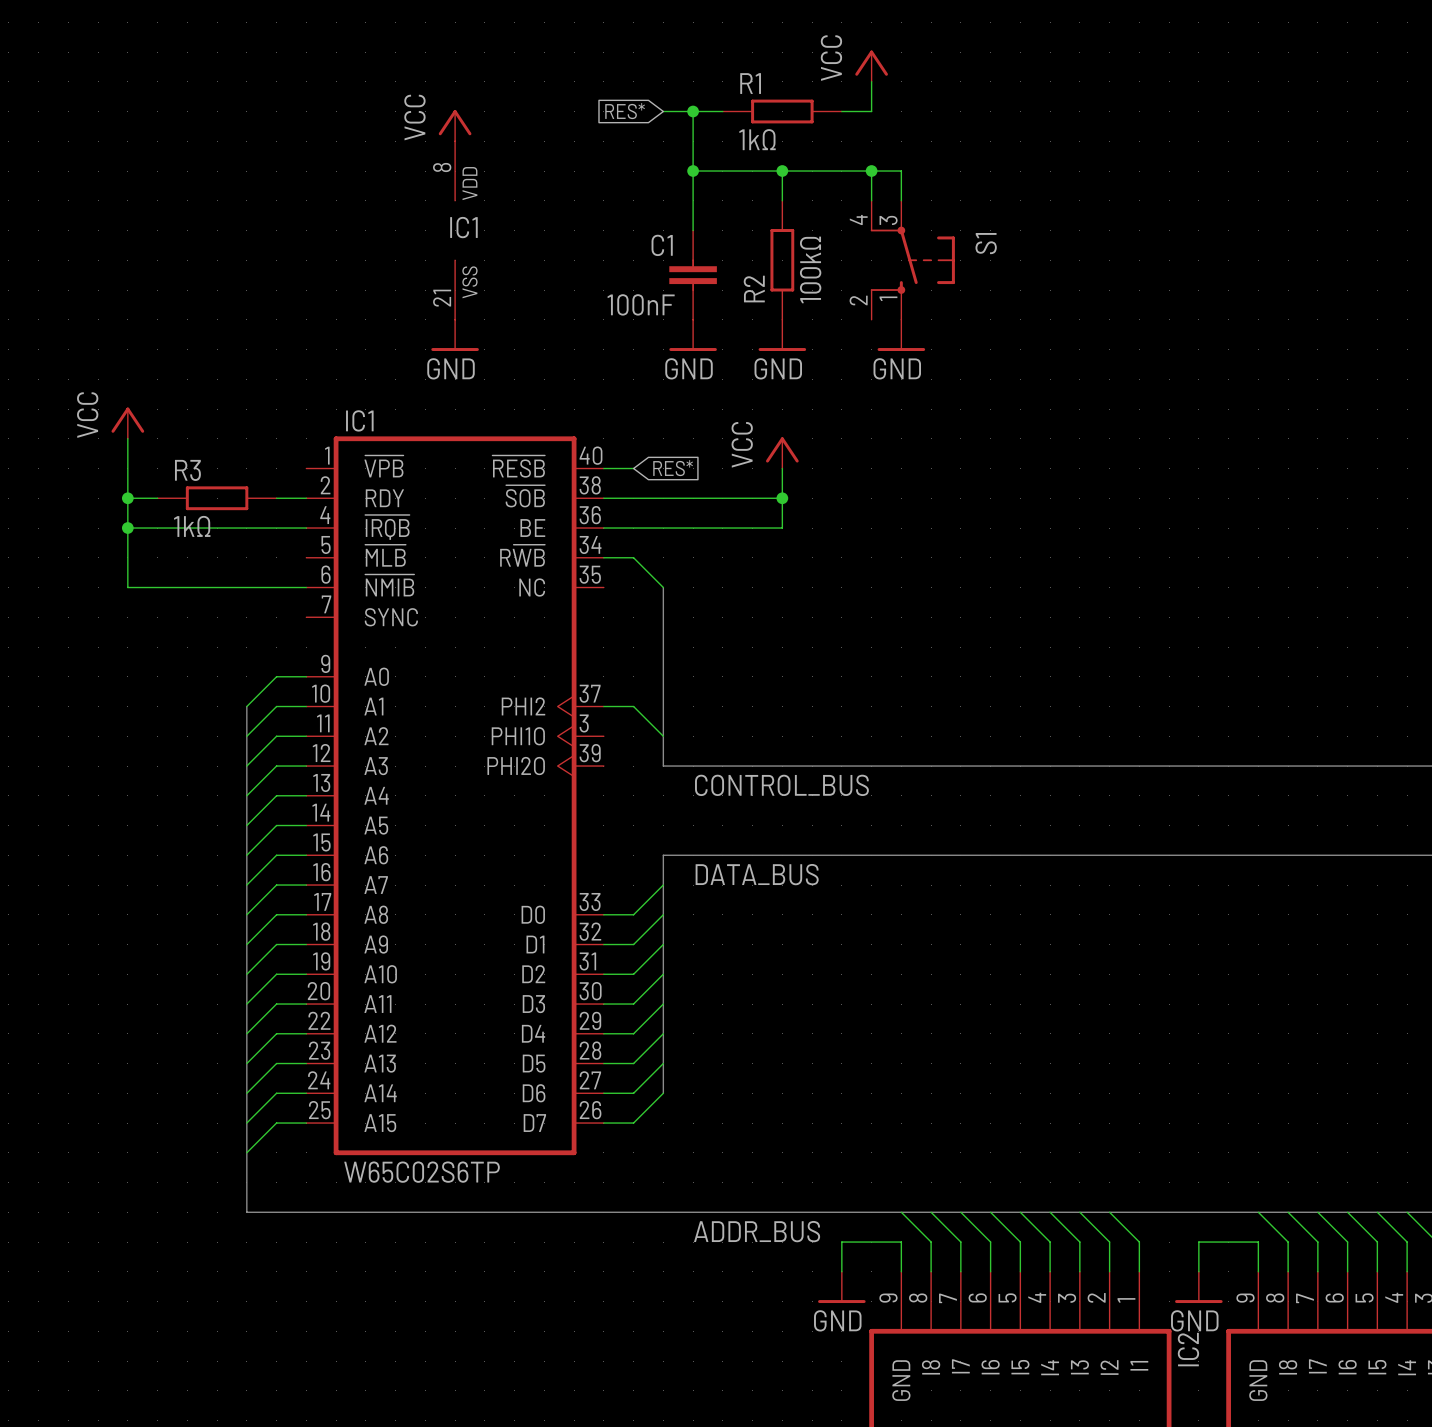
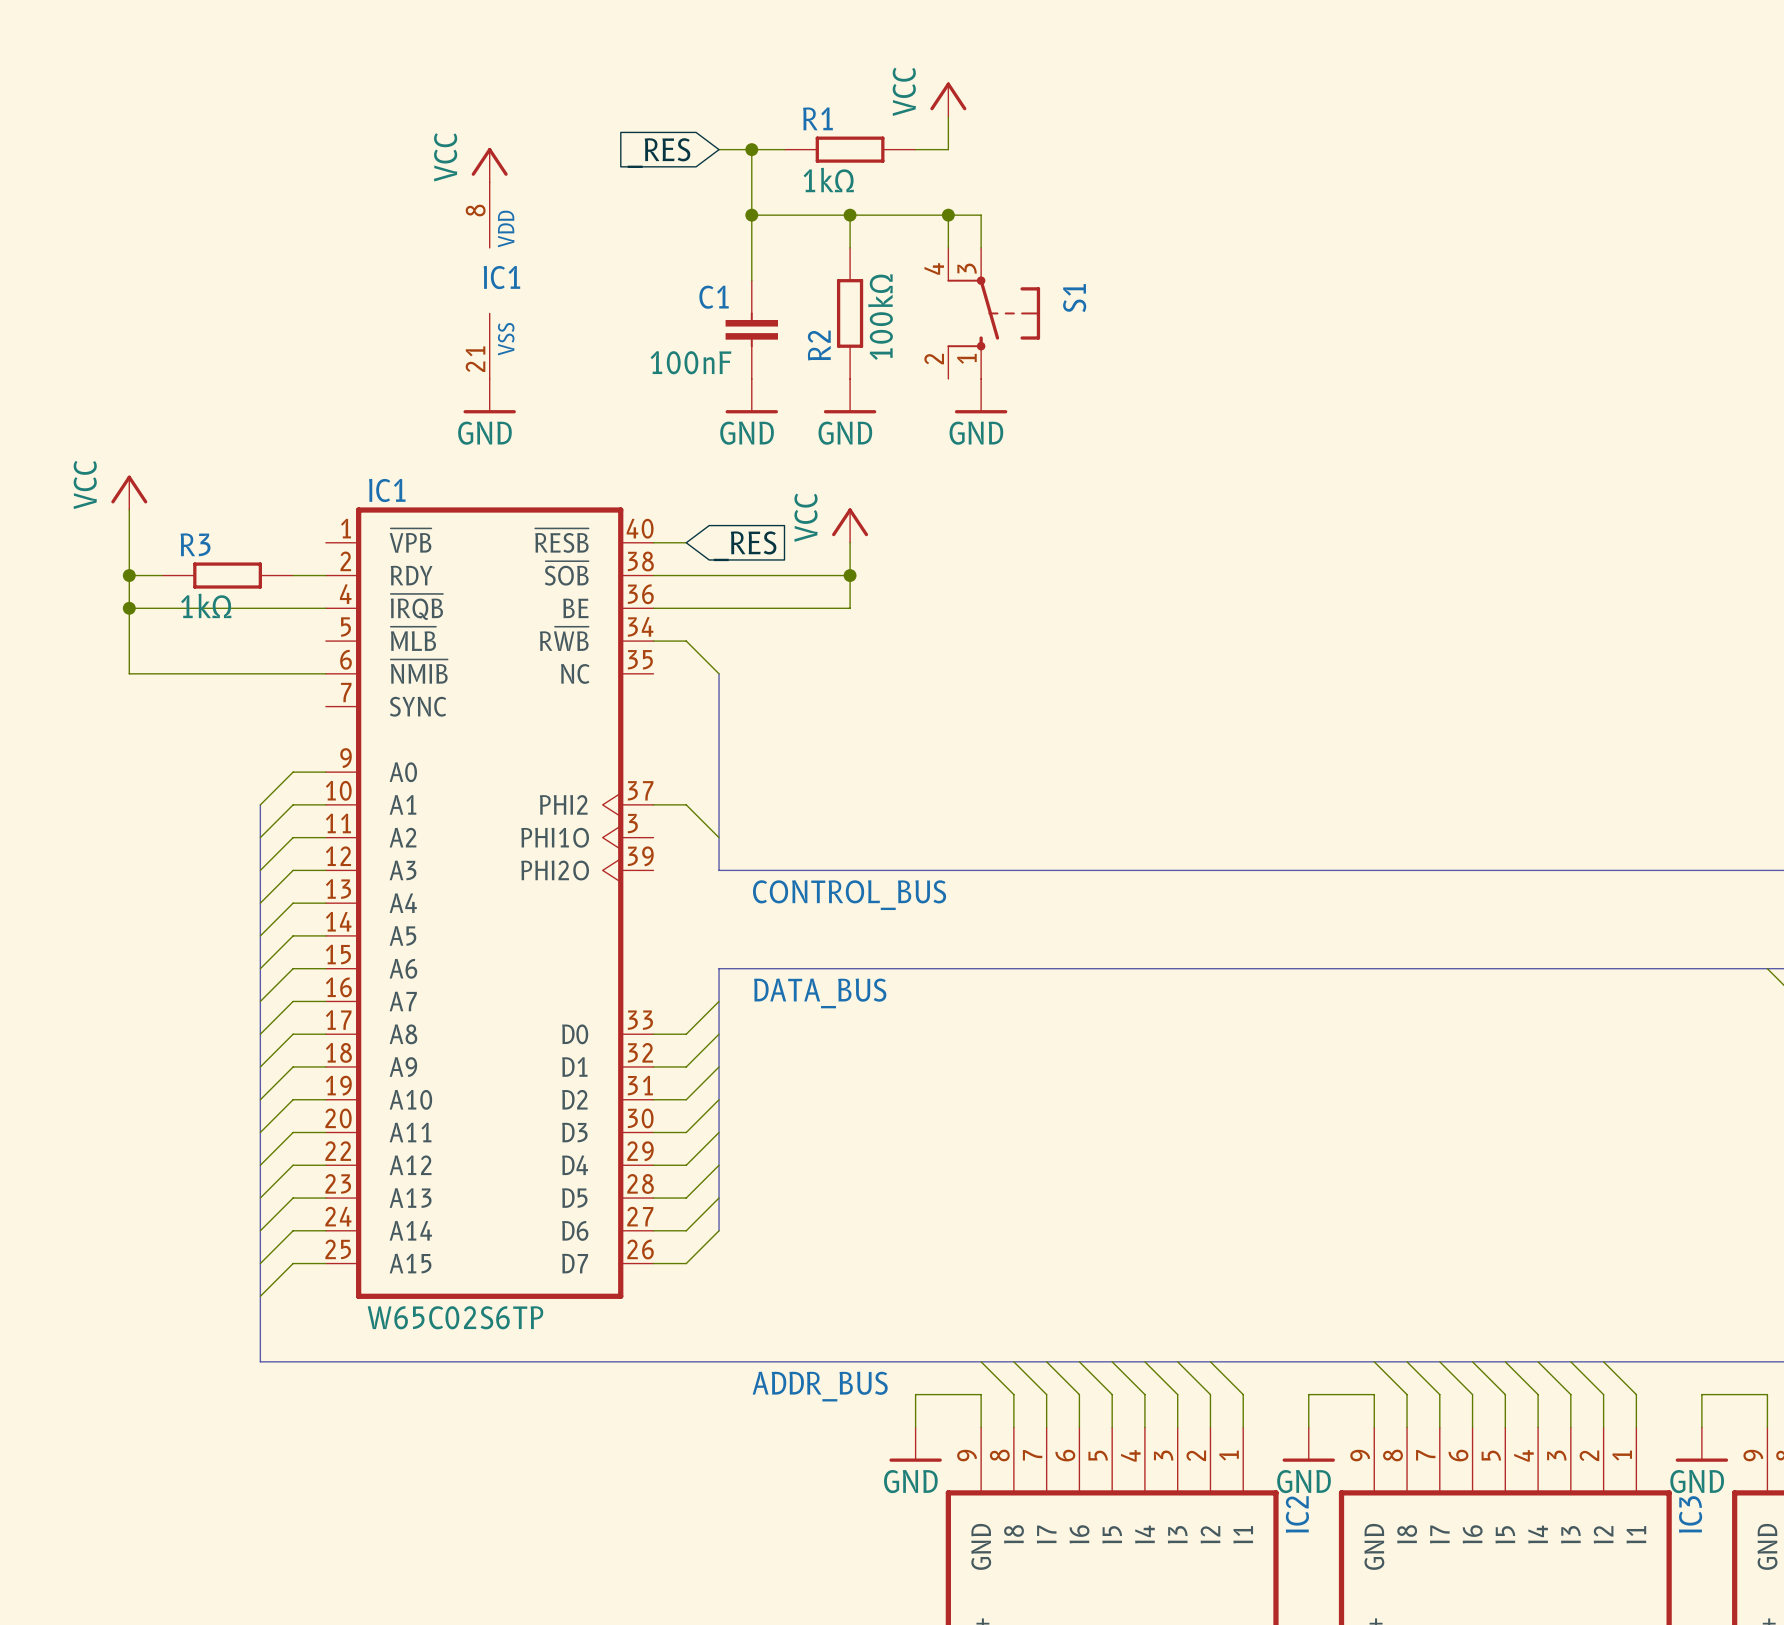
global label: RES* (625, 111) -> _RES (658, 153)
global label: RES* (673, 468) -> _RES (745, 546)

